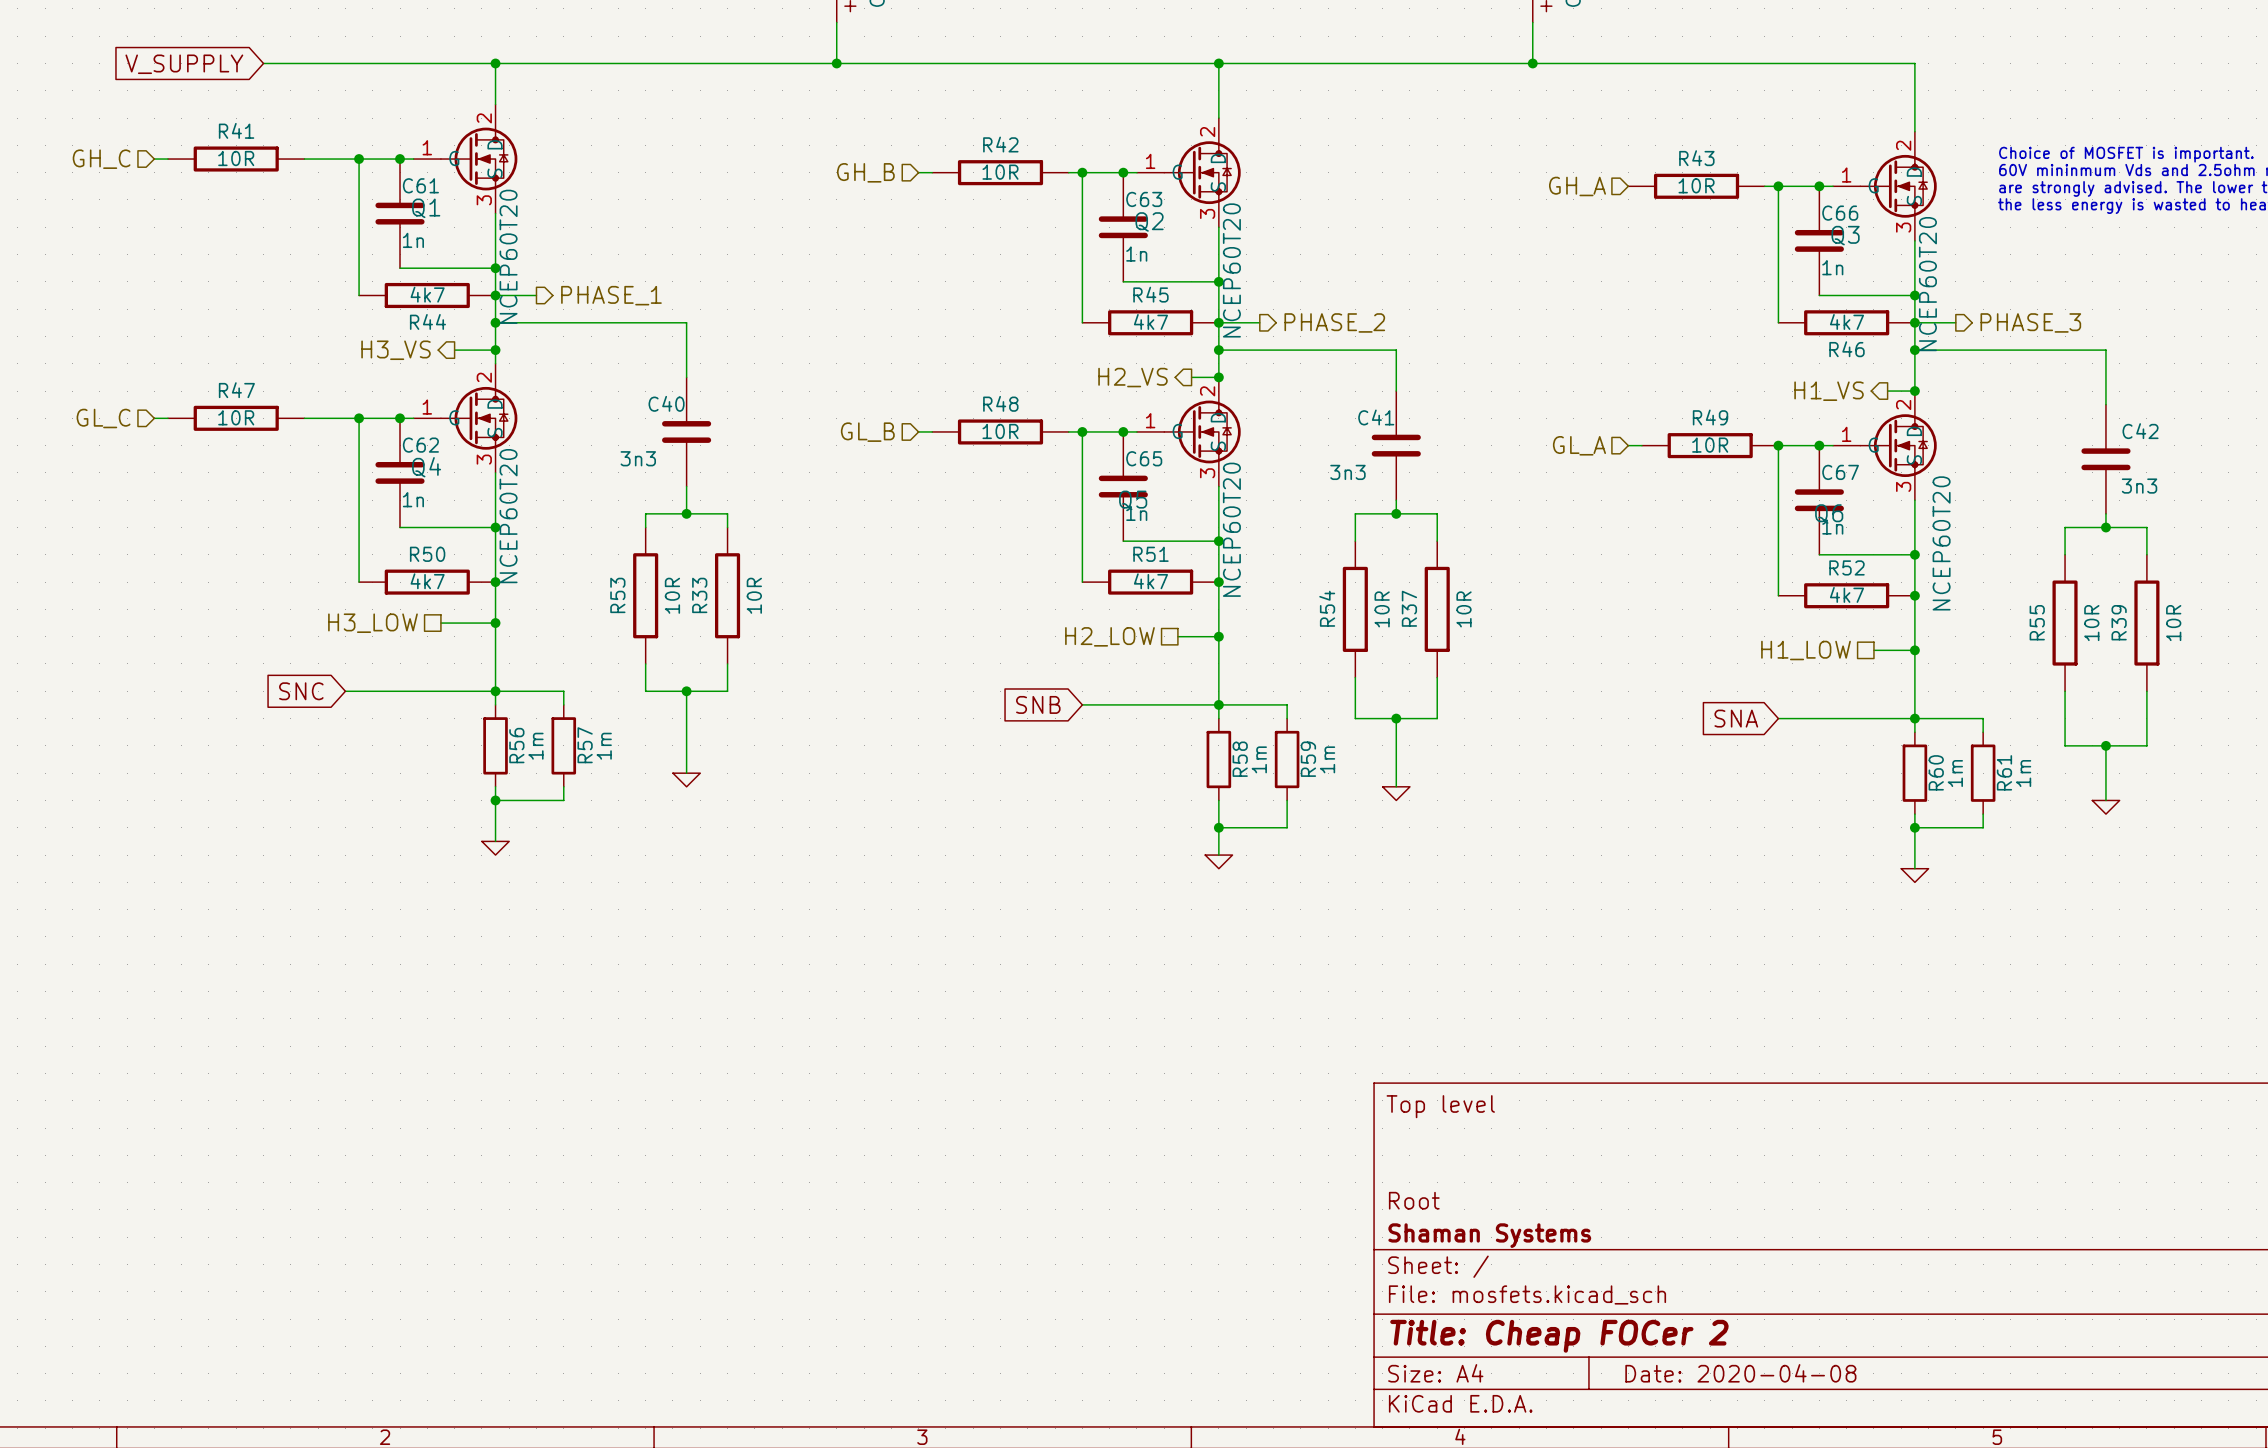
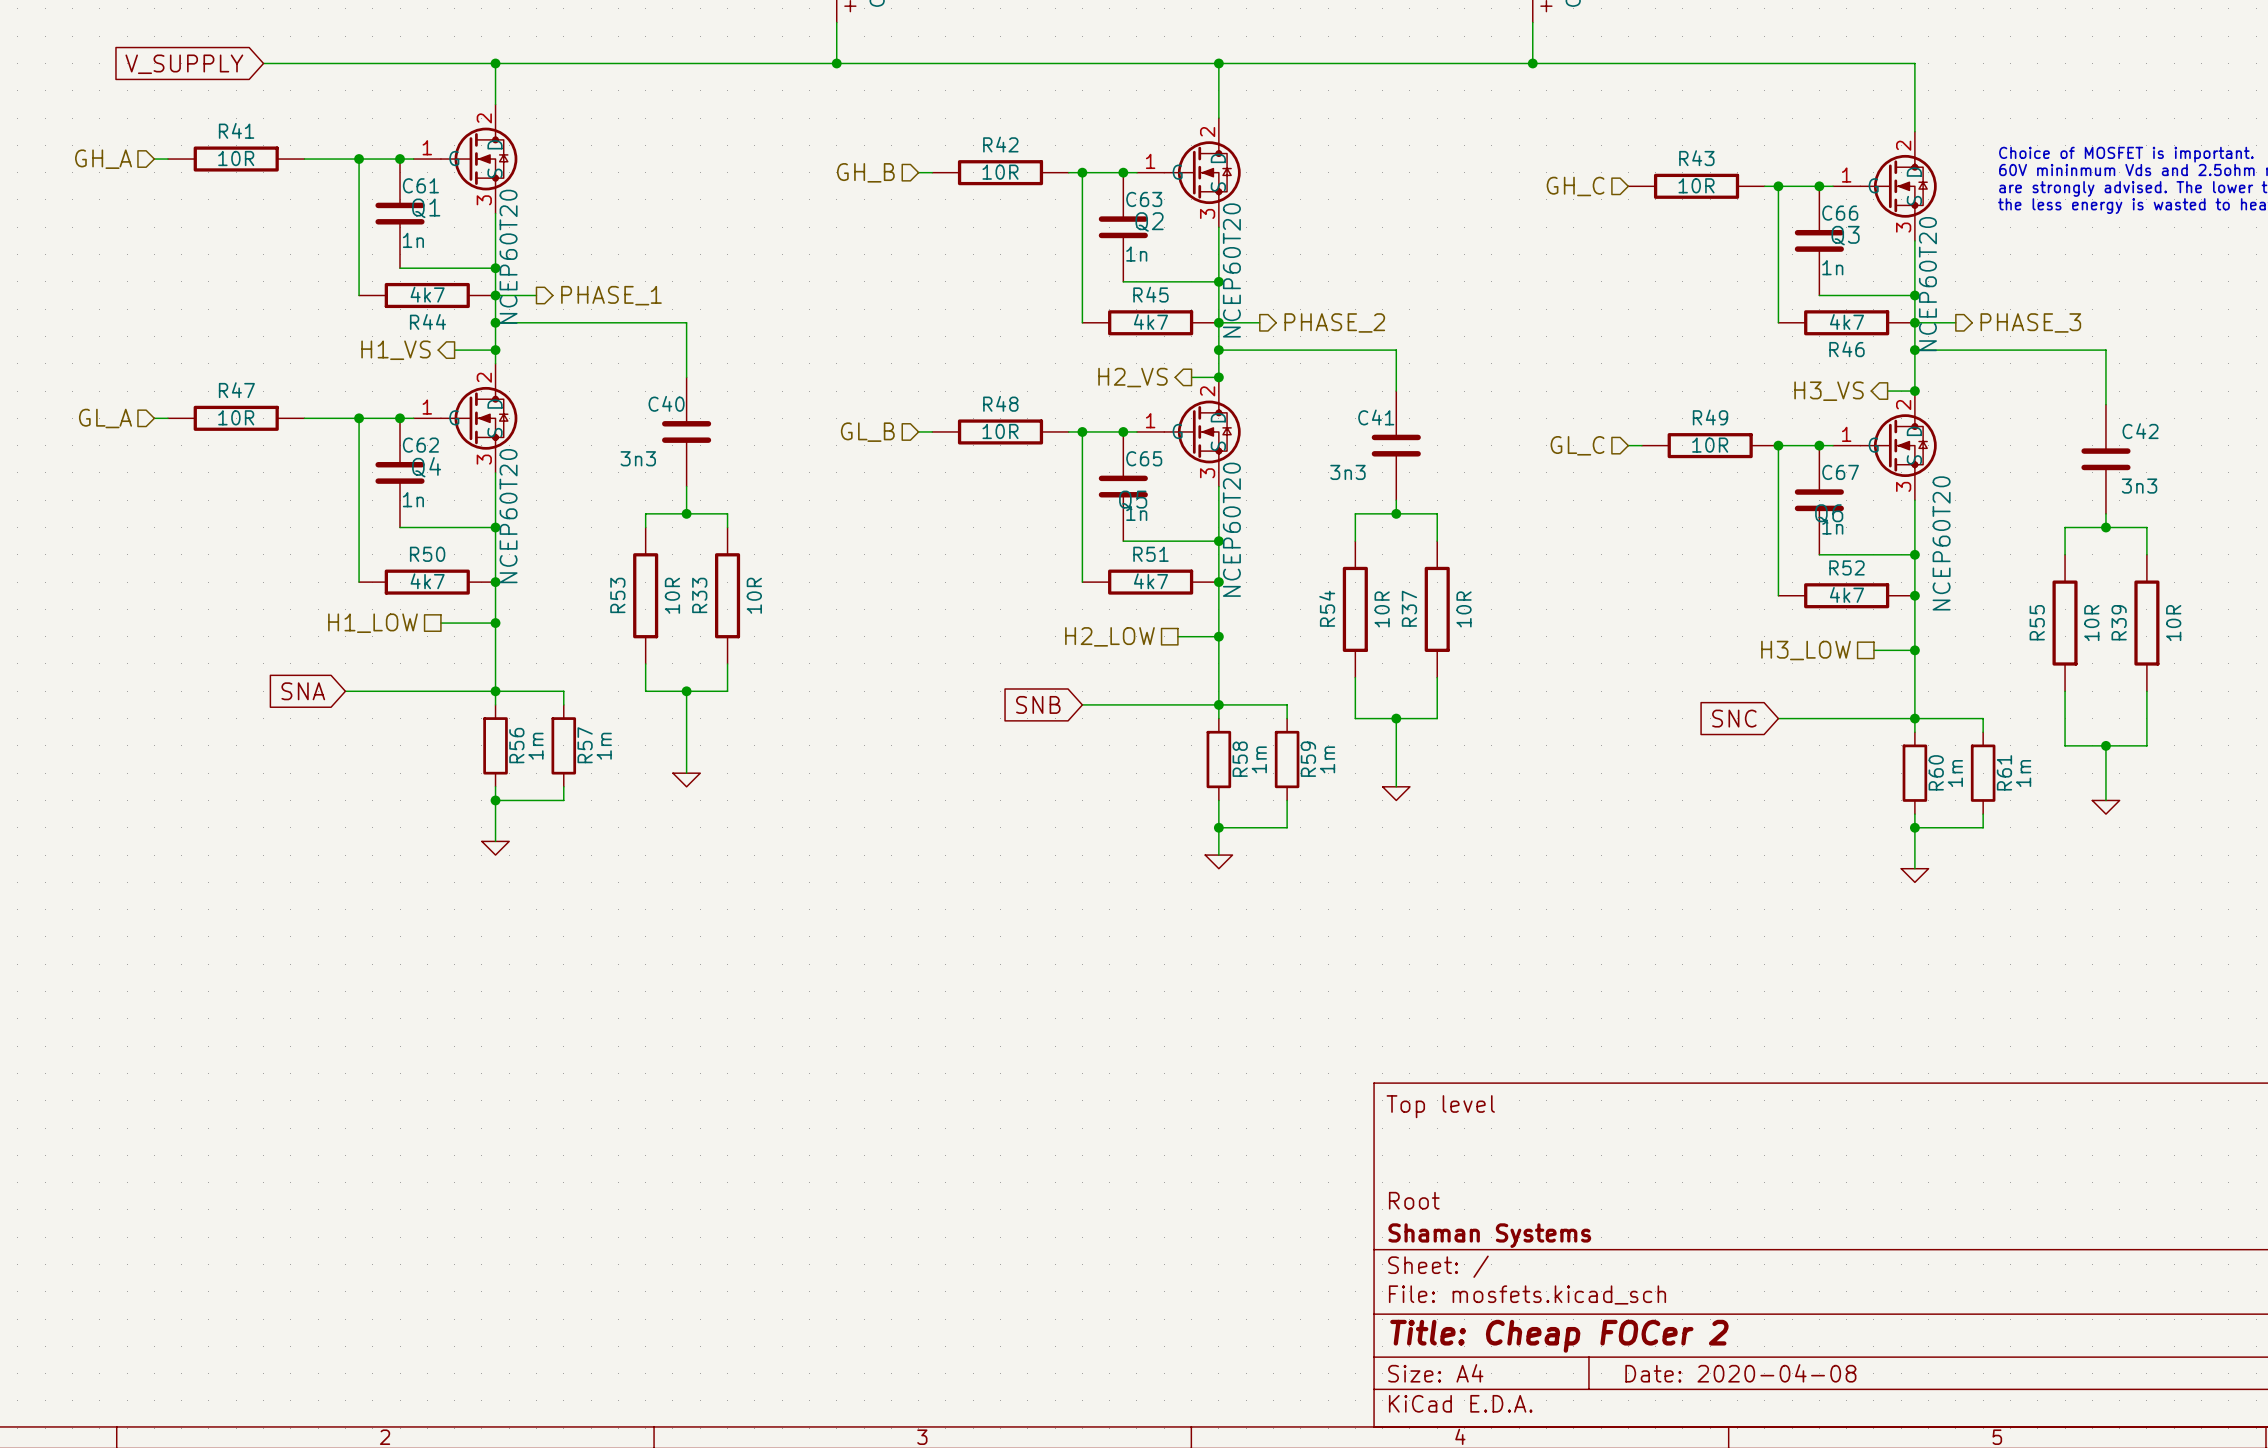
hierarchical label: GH_C (101, 159) -> GH_A (103, 159)
hierarchical label: GH_A (1577, 186) -> GH_C (1575, 186)
hierarchical label: H3_VS (395, 350) -> H1_VS (395, 350)
hierarchical label: H1_VS (1829, 391) -> H3_VS (1829, 391)
hierarchical label: GL_C (103, 418) -> GL_A (105, 418)
hierarchical label: GL_A (1579, 445) -> GL_C (1577, 445)
hierarchical label: H3_LOW (372, 623) -> H1_LOW (372, 623)
hierarchical label: H1_LOW (1806, 650) -> H3_LOW (1806, 650)
global label: SNC (301, 691) -> SNA (303, 691)
global label: SNA (1736, 718) -> SNC (1734, 718)

